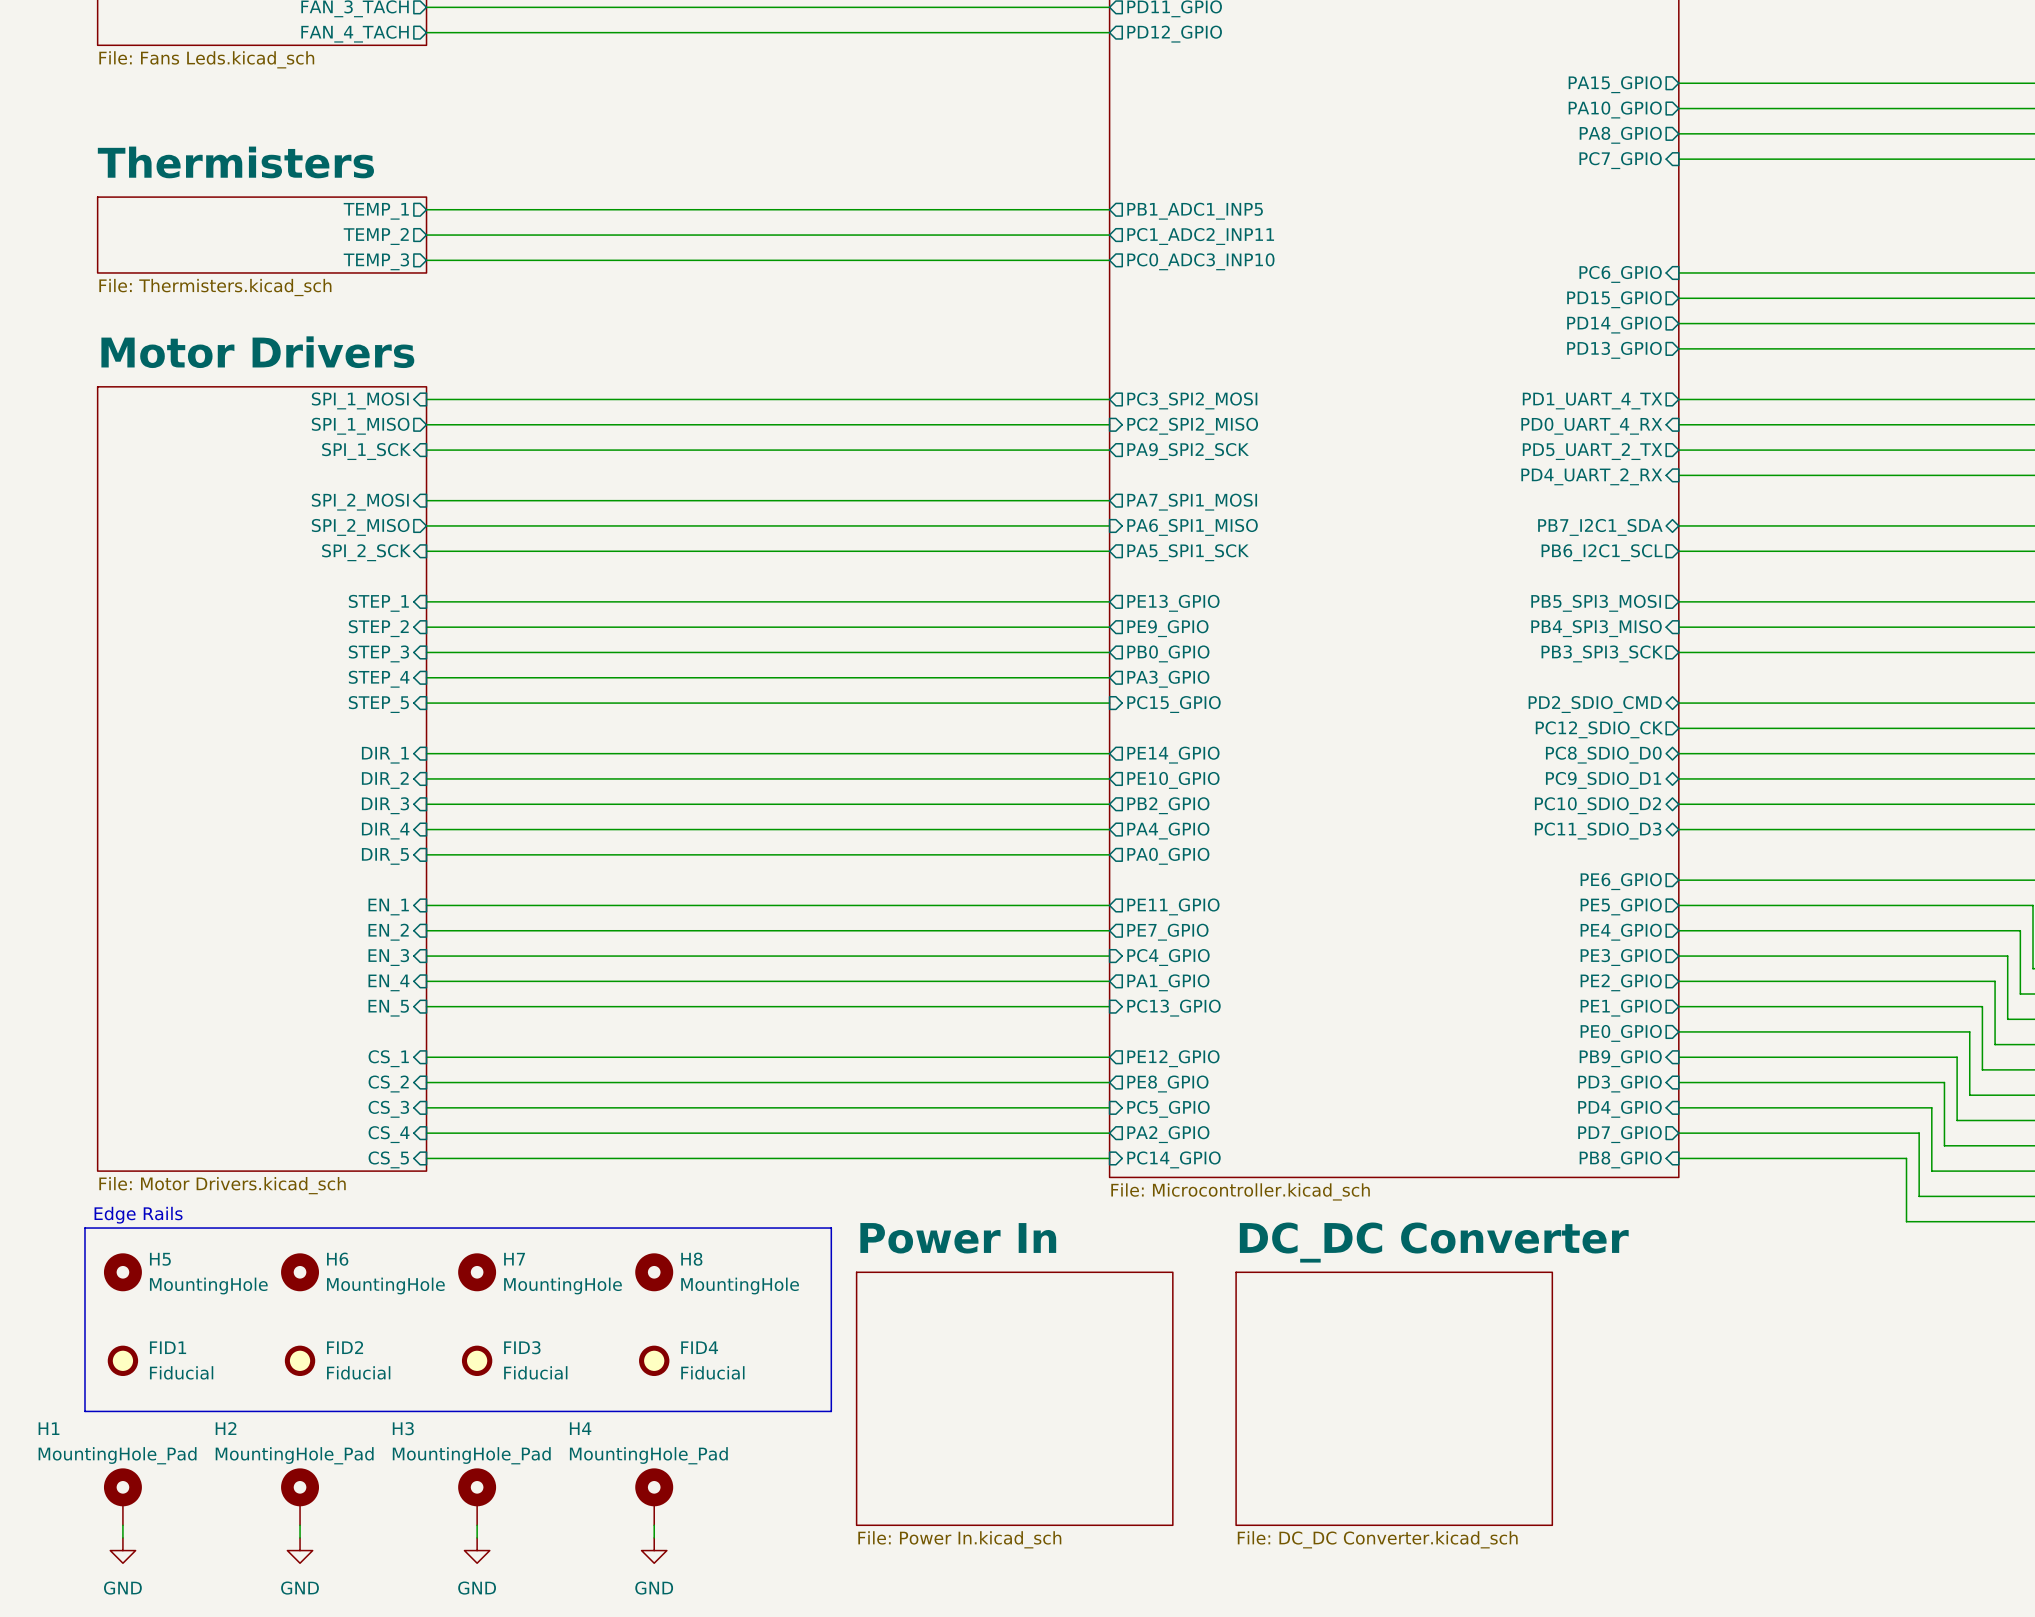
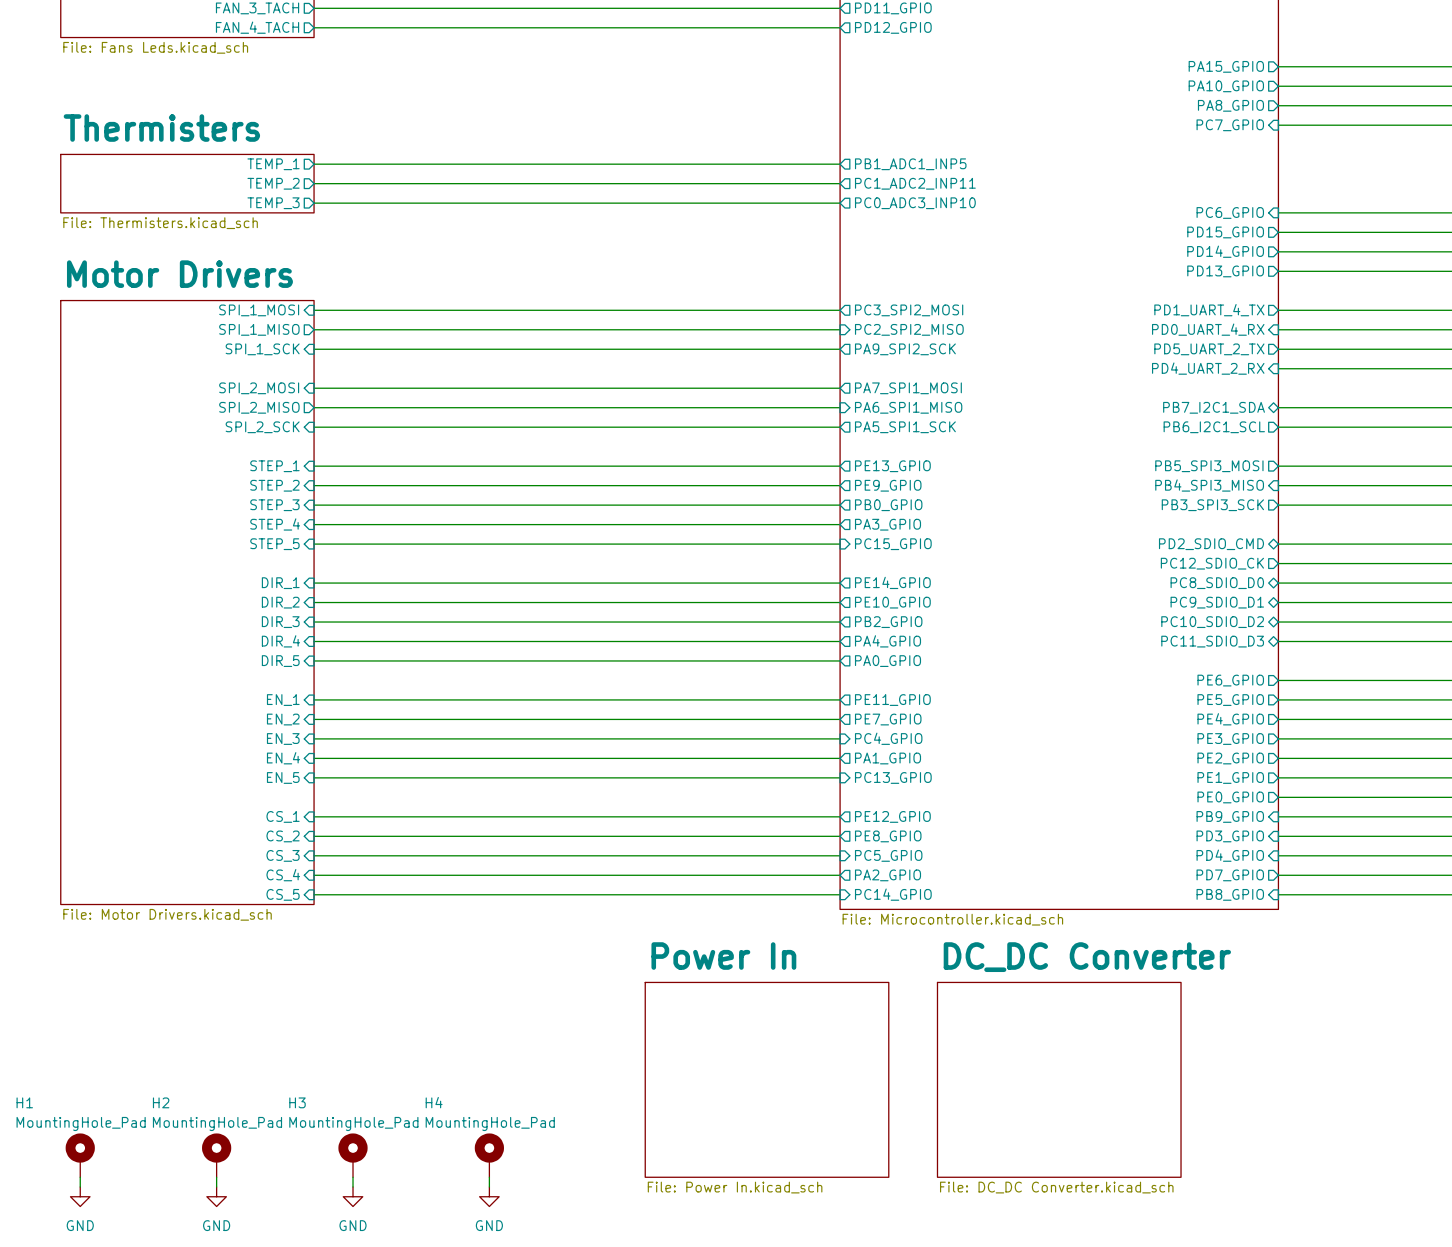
text: Edge Rails (138, 1215) -> none
line: (84, 1228) (831, 1228) (831, 1411) (84, 1411) (84, 1228) -> none
H5: MountingHole (122, 1272) -> none
H6: MountingHole (300, 1272) -> none
H7: MountingHole (477, 1272) -> none
H8: MountingHole (654, 1272) -> none
FID1: Fiducial (122, 1360) -> none
FID2: Fiducial (300, 1360) -> none
FID3: Fiducial (477, 1360) -> none
FID4: Fiducial (654, 1360) -> none

